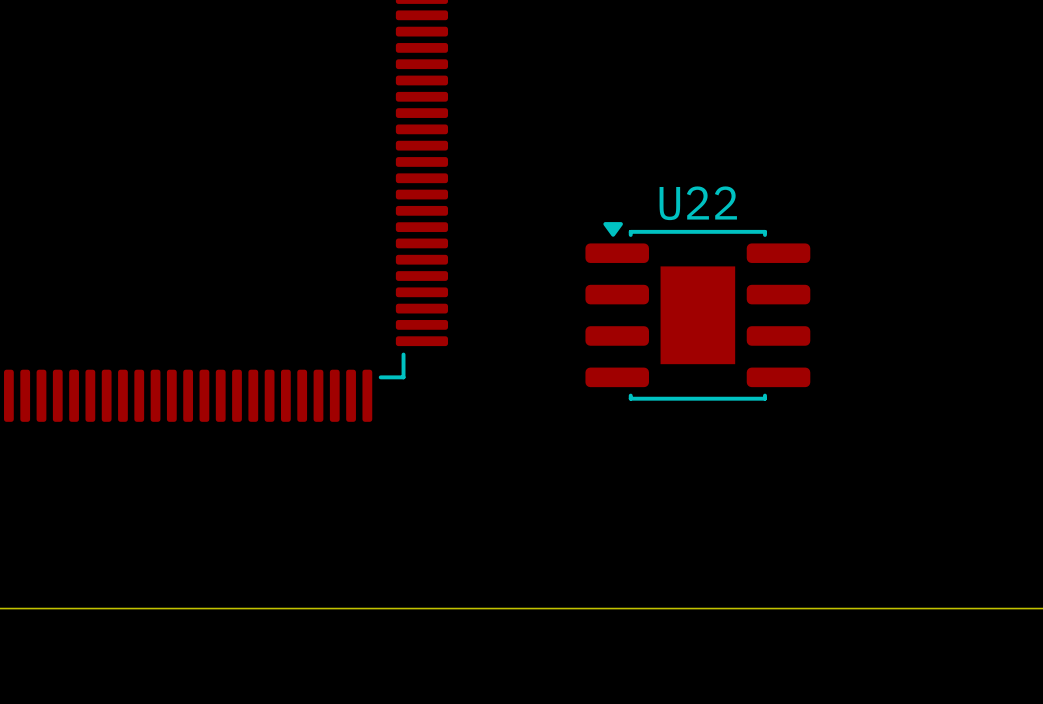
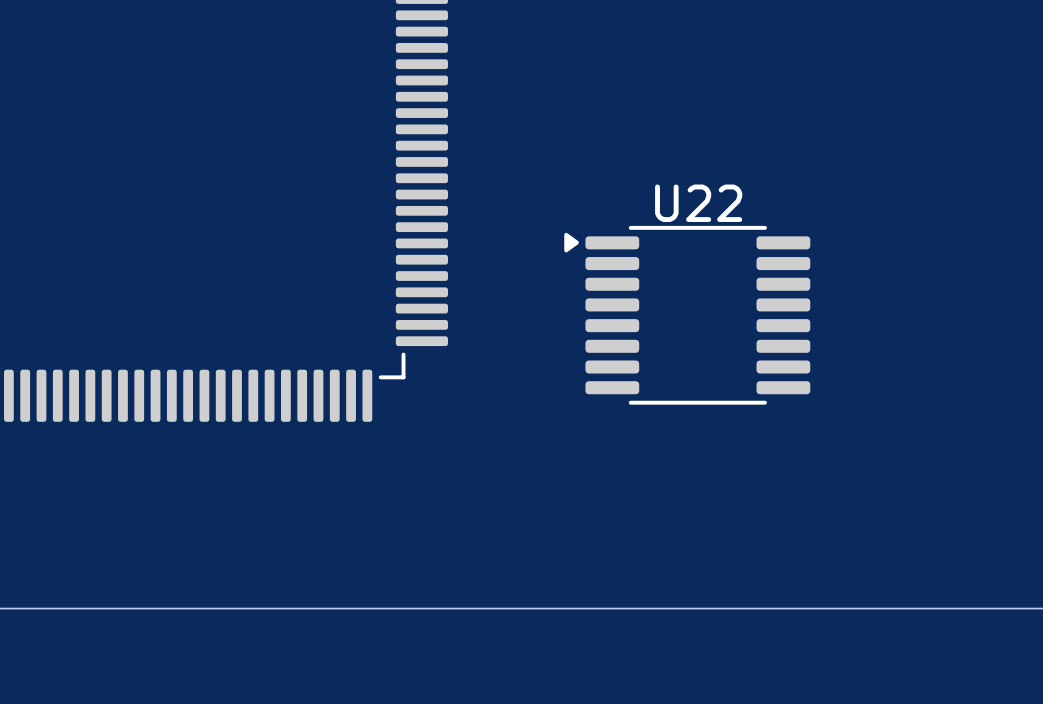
U22 footprint: [585, 222, 811, 401] -> [564, 225, 811, 405]

